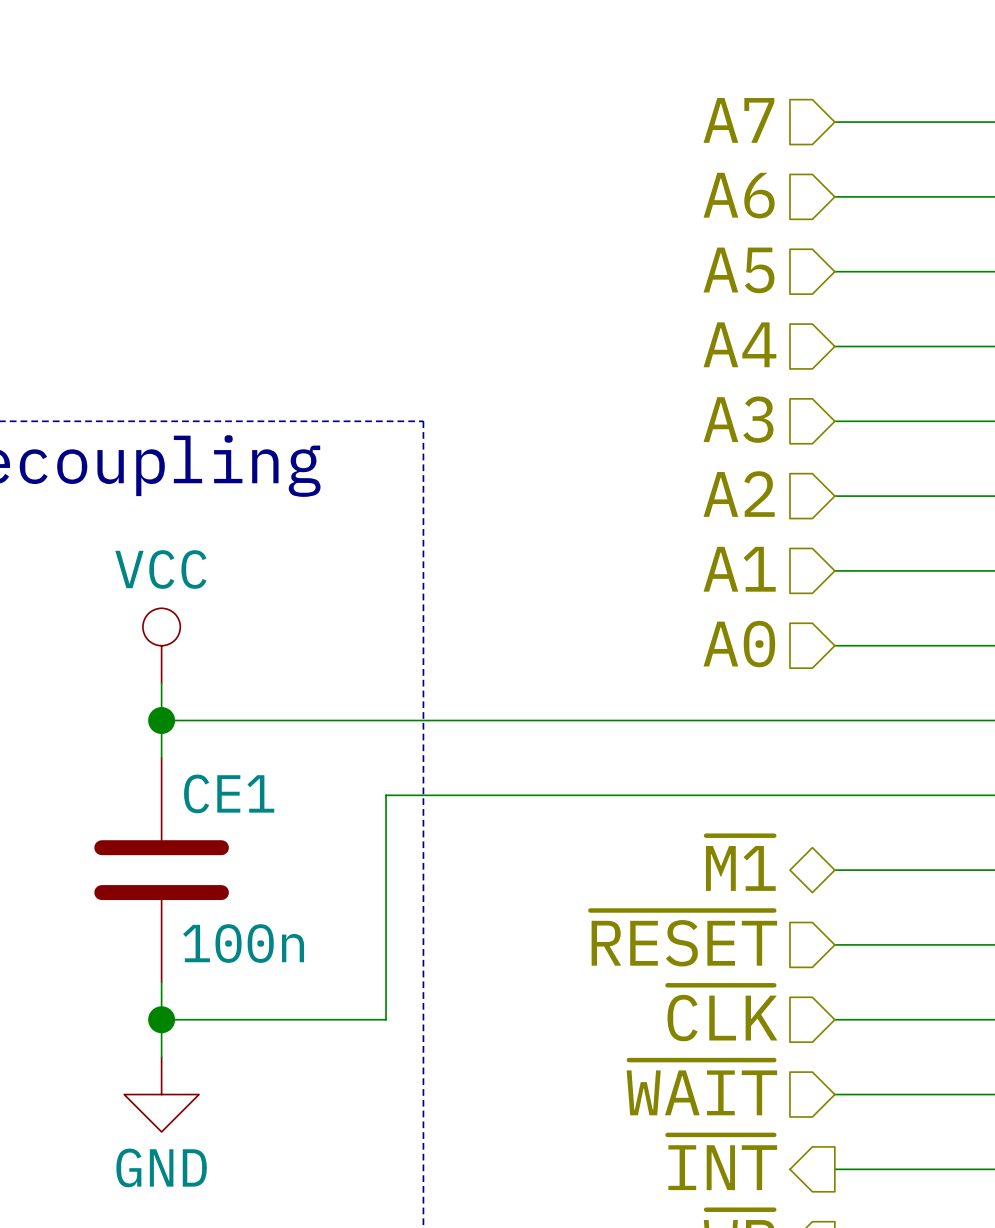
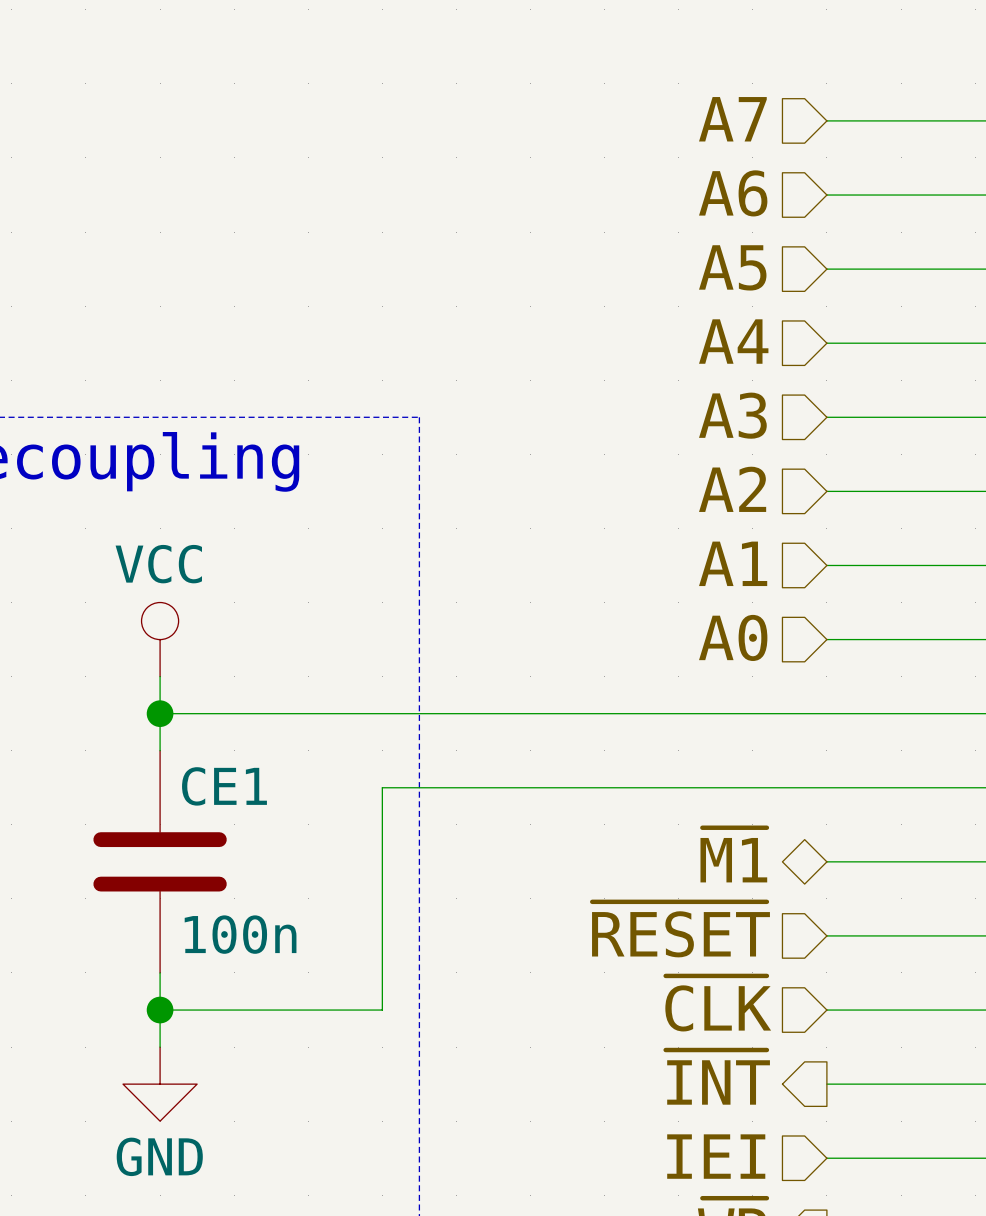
hierarchical label shape: input (701, 1087) -> output (717, 1077)
hierarchical label: ~{WAIT} (701, 1087) -> ~{INT} (717, 1077)
hierarchical label shape: output (722, 1162) -> input (716, 1156)
hierarchical label: ~{INT} (722, 1162) -> IEI (716, 1156)

